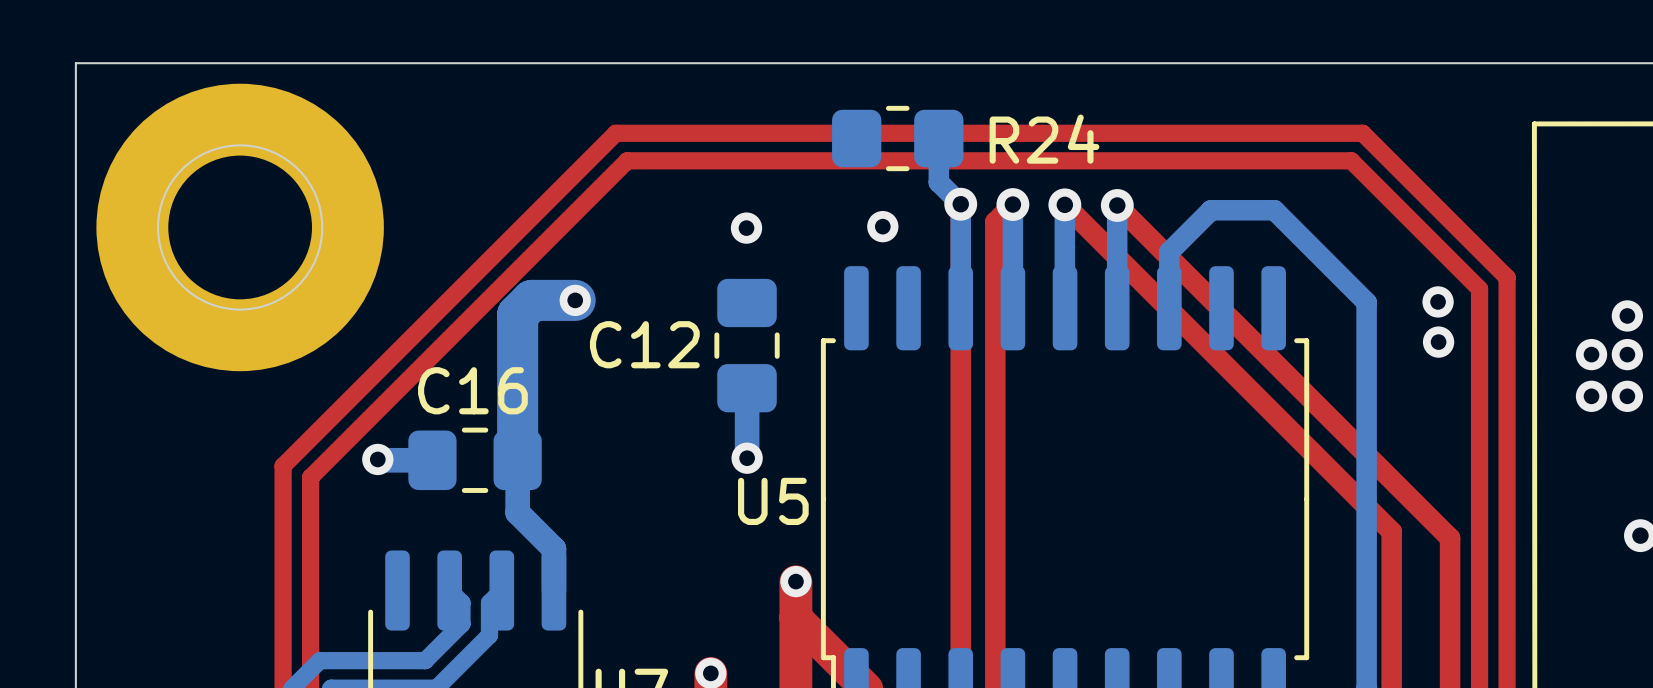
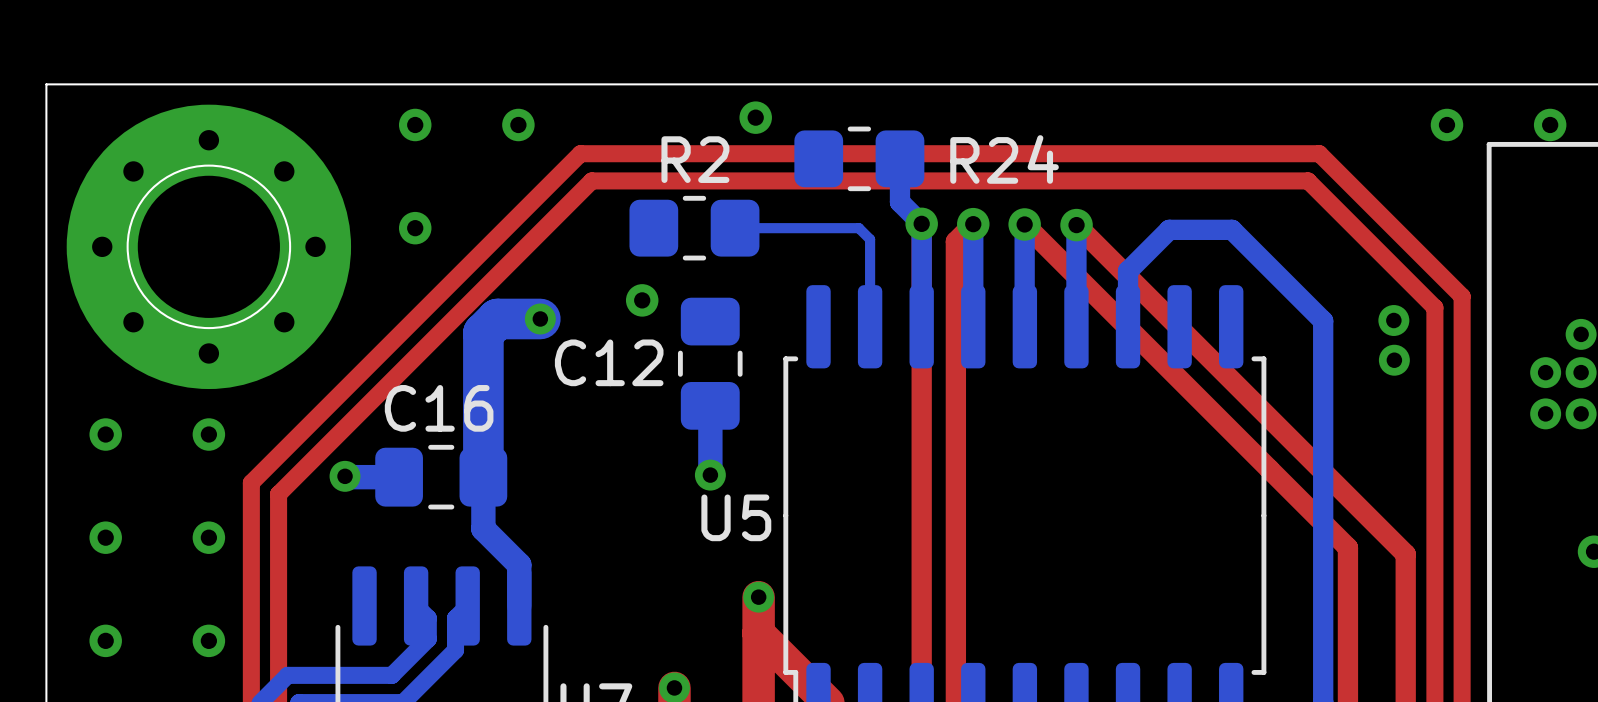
part footprint: [96, 83, 384, 372] -> [66, 104, 352, 390]
via: none -> (755, 117)
via: none -> (415, 124)
via: none -> (518, 124)
via: none -> (1446, 124)
via: none -> (1550, 124)
via: none -> (415, 228)
R2: none -> (694, 228)
bottom track: none -> (735, 228) (858, 228) (870, 239) (870, 326)
via: (882, 226) -> none
via: (746, 228) -> none
via: none -> (642, 300)
via: none -> (105, 434)
via: none -> (208, 434)
via: none -> (105, 537)
via: none -> (208, 537)
via: none -> (105, 640)
via: none -> (208, 640)

